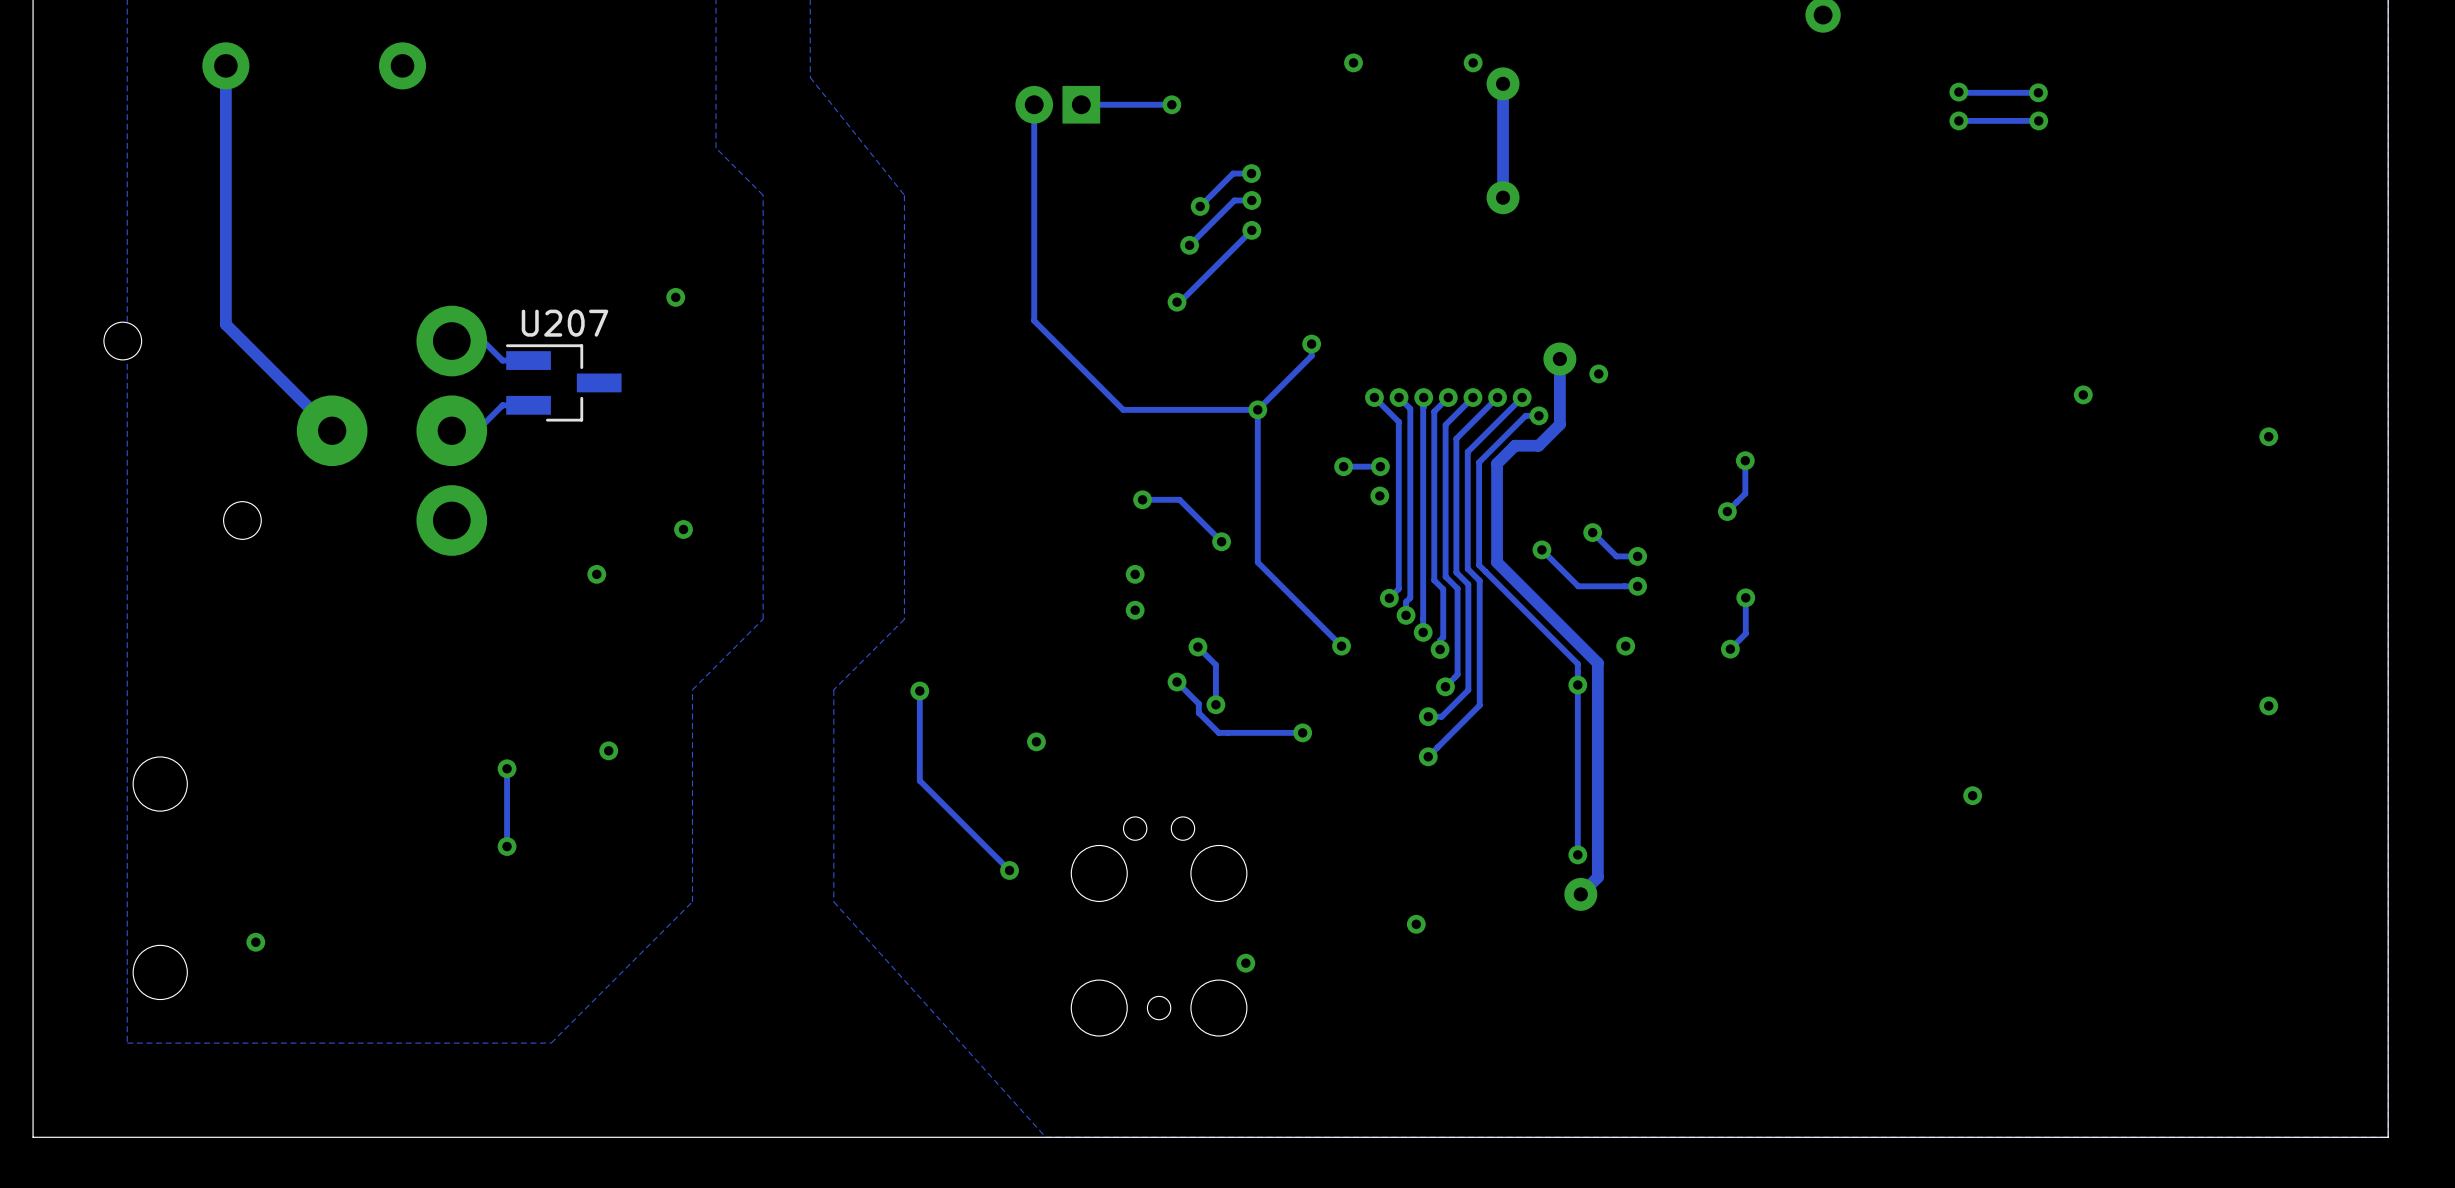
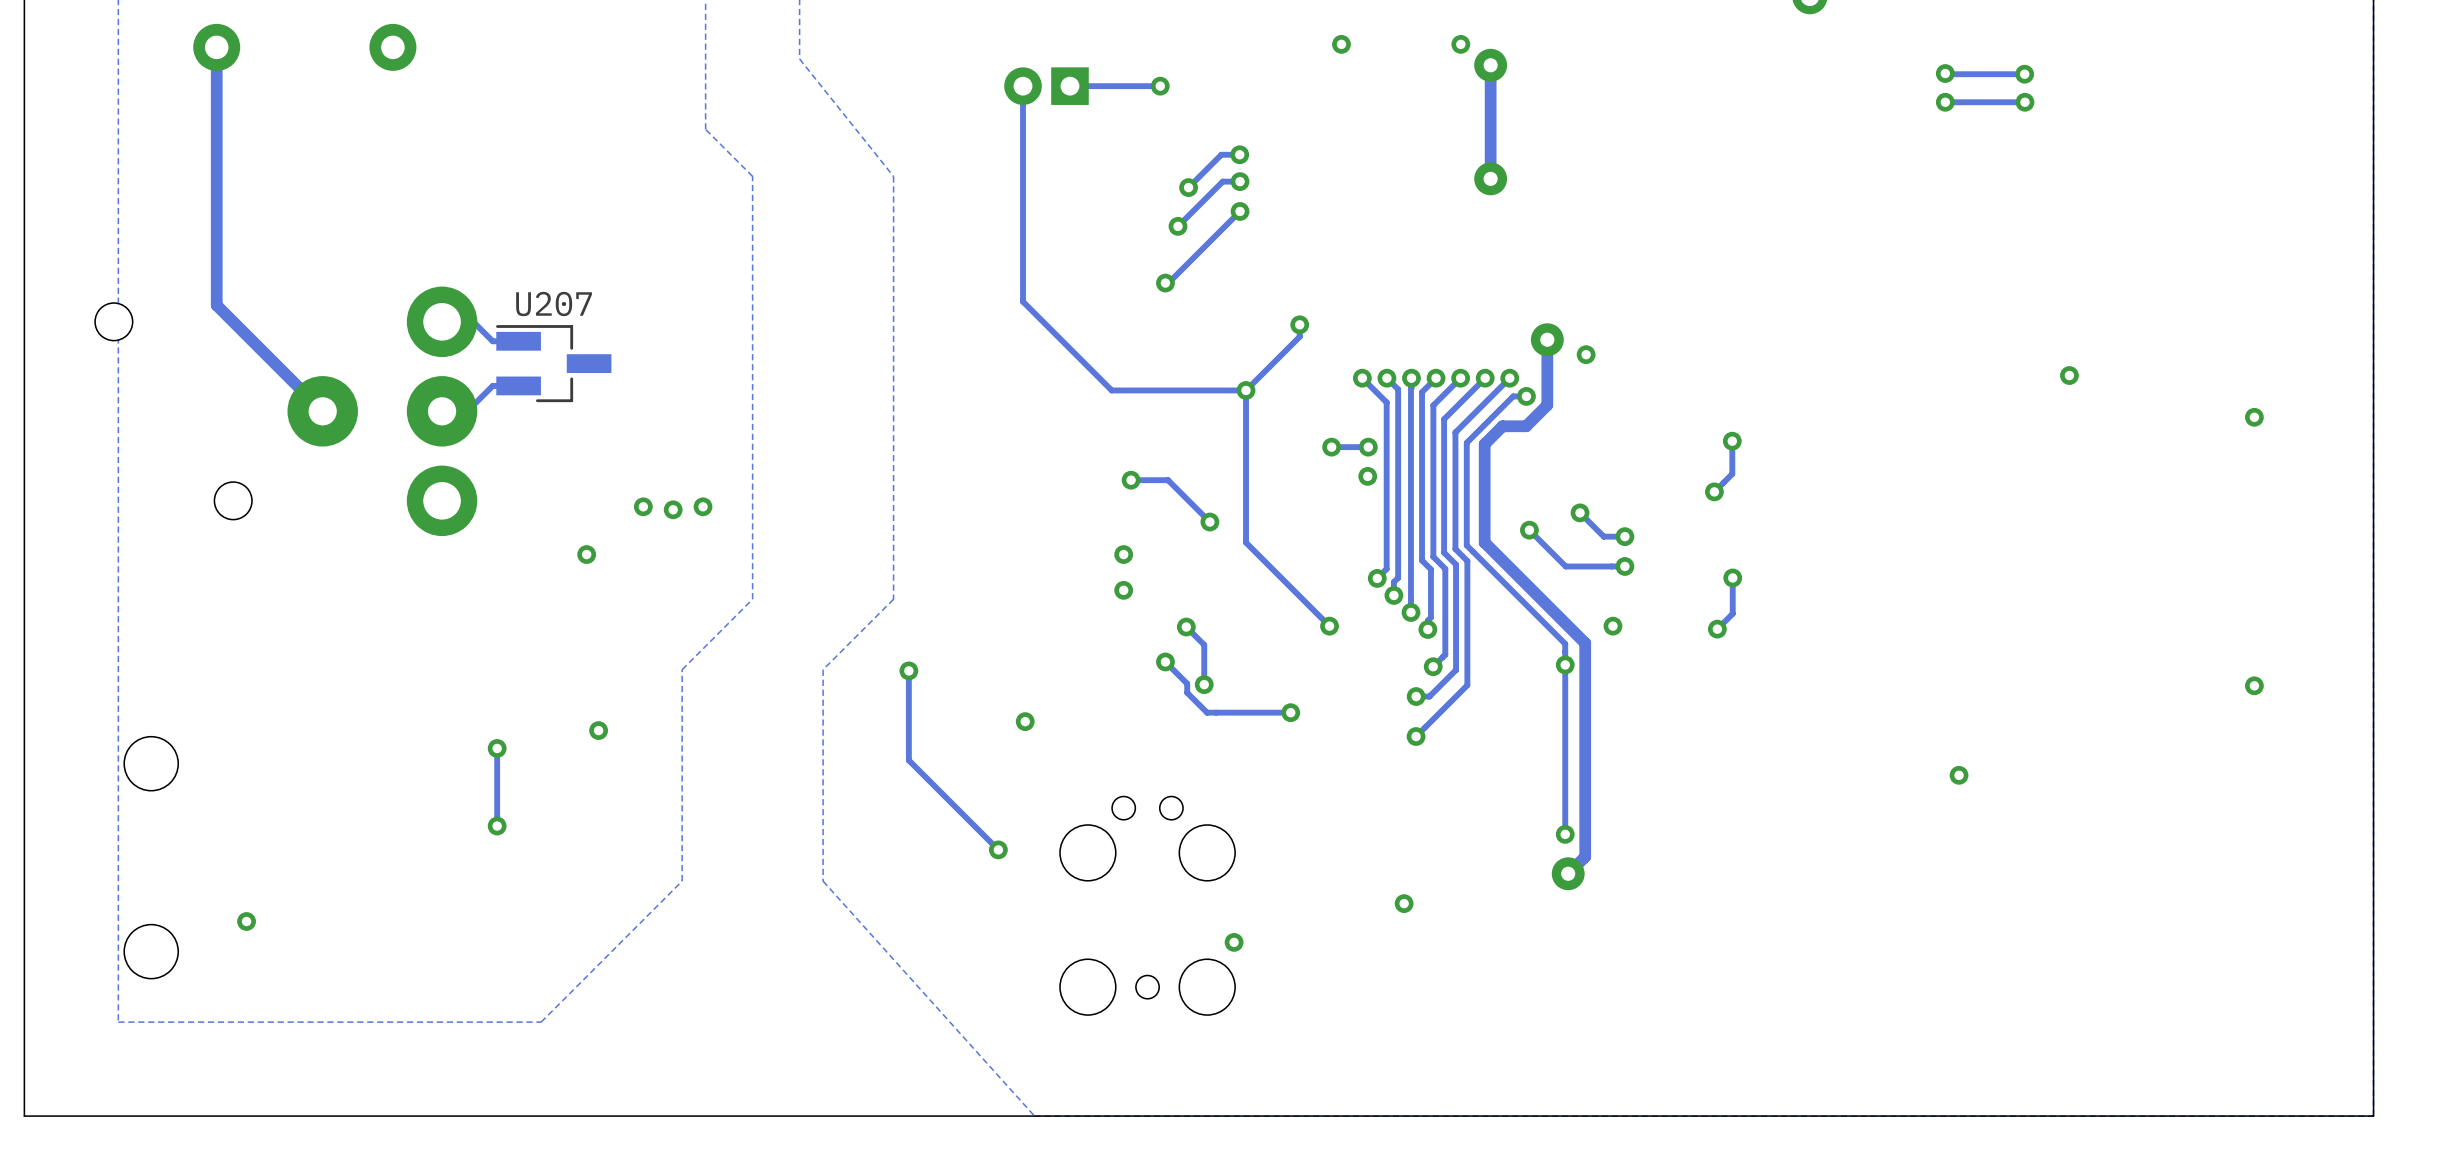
via: (675, 297) -> none
via: none -> (643, 506)
via: none -> (703, 506)

